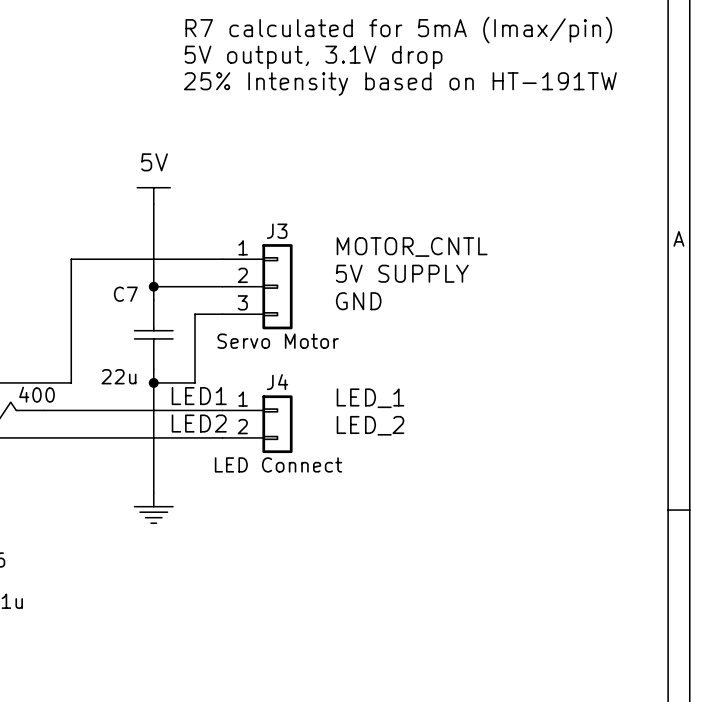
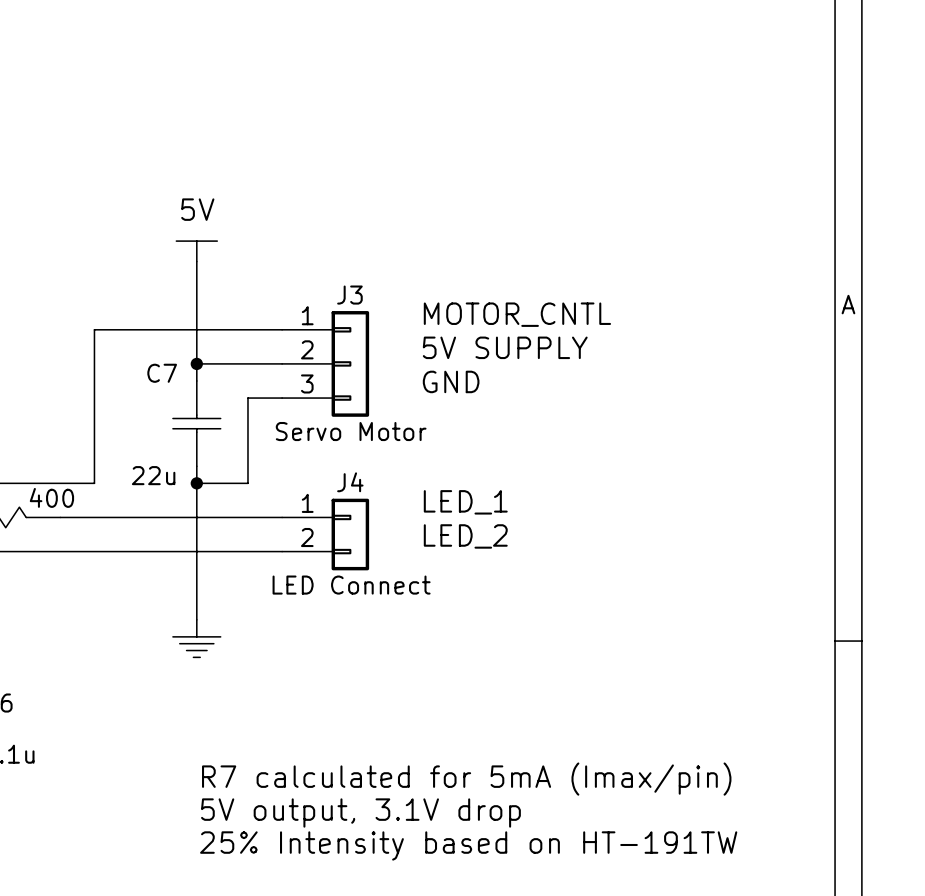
text: R7 calculated for 5mA (Imax/pin) (398, 30) -> none
text: 5V output, 3.1V drop (313, 57) -> none
text: 25% Intensity based on HT-191TW (400, 84) -> none
label: LED1 (199, 396) -> none
label: LED2 (199, 423) -> none
text: none -> R7 calculated for 5mA (Imax/pin) (466, 779)
text: none -> 5V output, 3.1V drop (360, 813)
text: none -> 25% Intensity based on HT-191TW (468, 845)

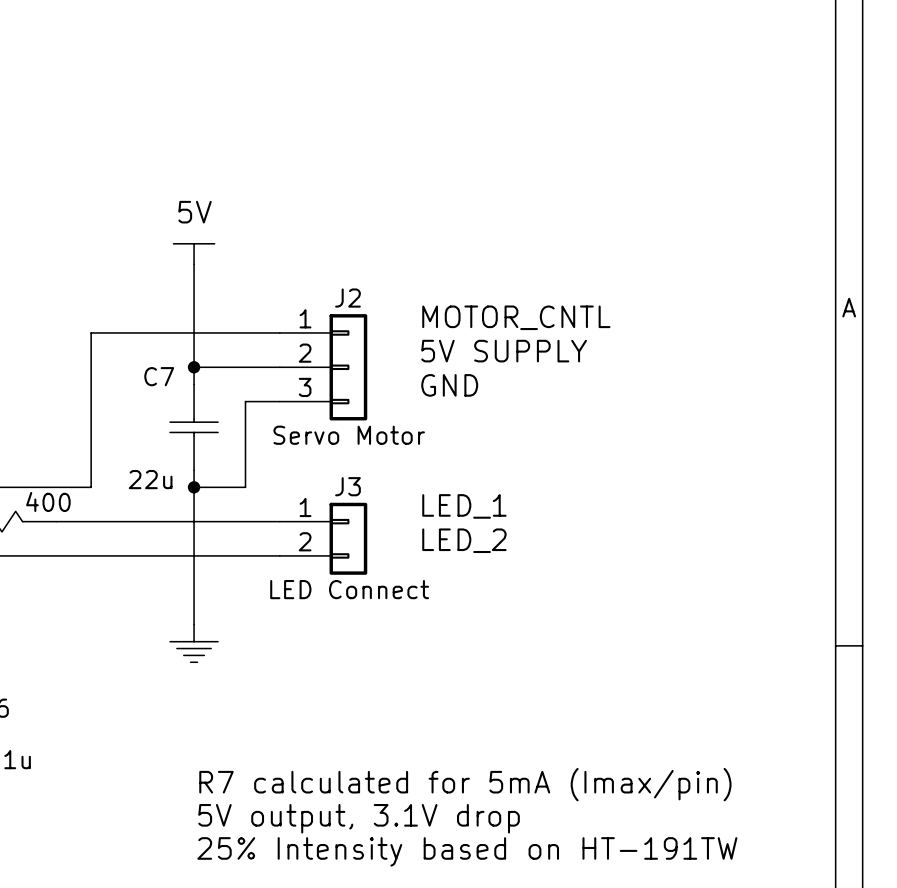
J3 name: J3 (349, 295) -> J2 (347, 298)
J4 name: J4 (350, 482) -> J3 (347, 486)

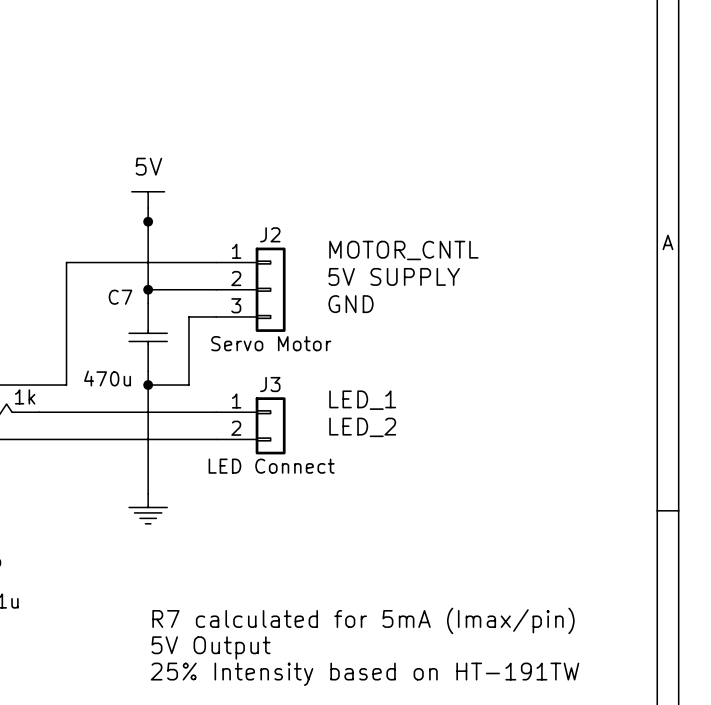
junction: none -> (148, 221)
C7 value: 22u (150, 479) -> 470u (107, 378)
part value: 400 (48, 501) -> 1k (25, 396)
text: 5V output, 3.1V drop (359, 818) -> 5V Output (211, 647)

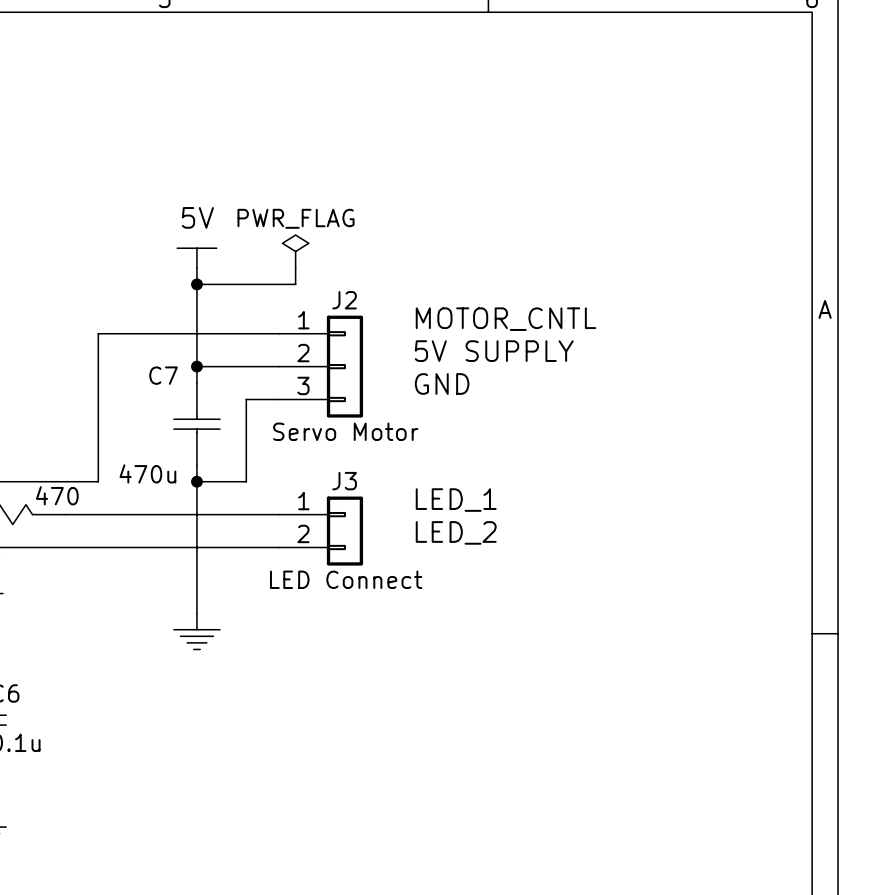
power symbol: none -> PWR_FLAG (295, 251)
wire: none -> (295, 267) (295, 284) (196, 284)
part value: 1k (25, 396) -> 470 (57, 495)
text: R7 calculated for 5mA (Imax/pin) (363, 620) -> none
text: 5V Output (211, 647) -> none
text: 25% Intensity based on HT-191TW (365, 674) -> none

